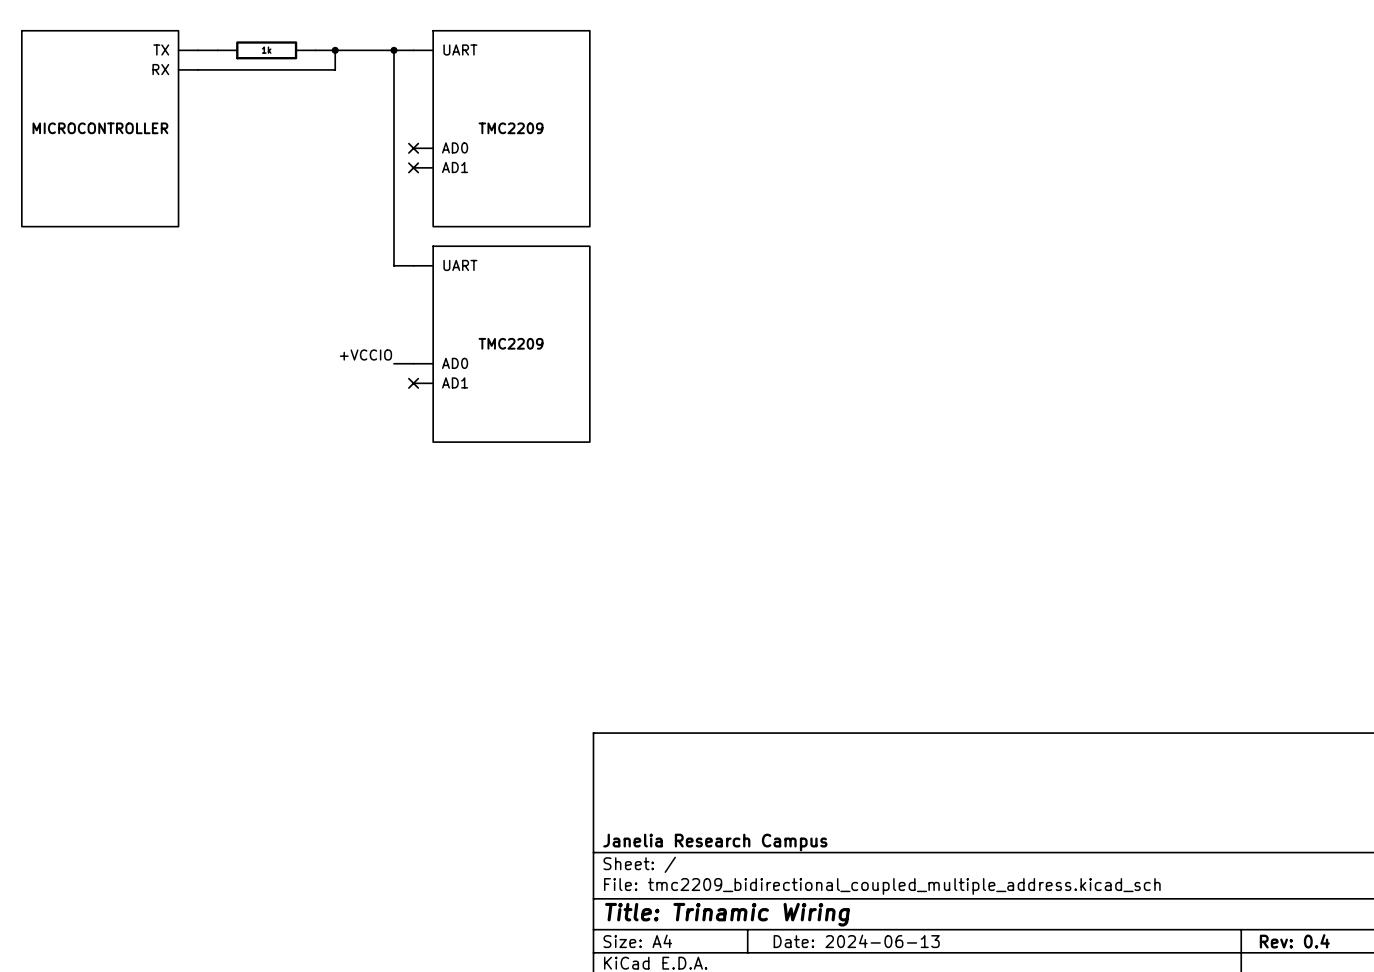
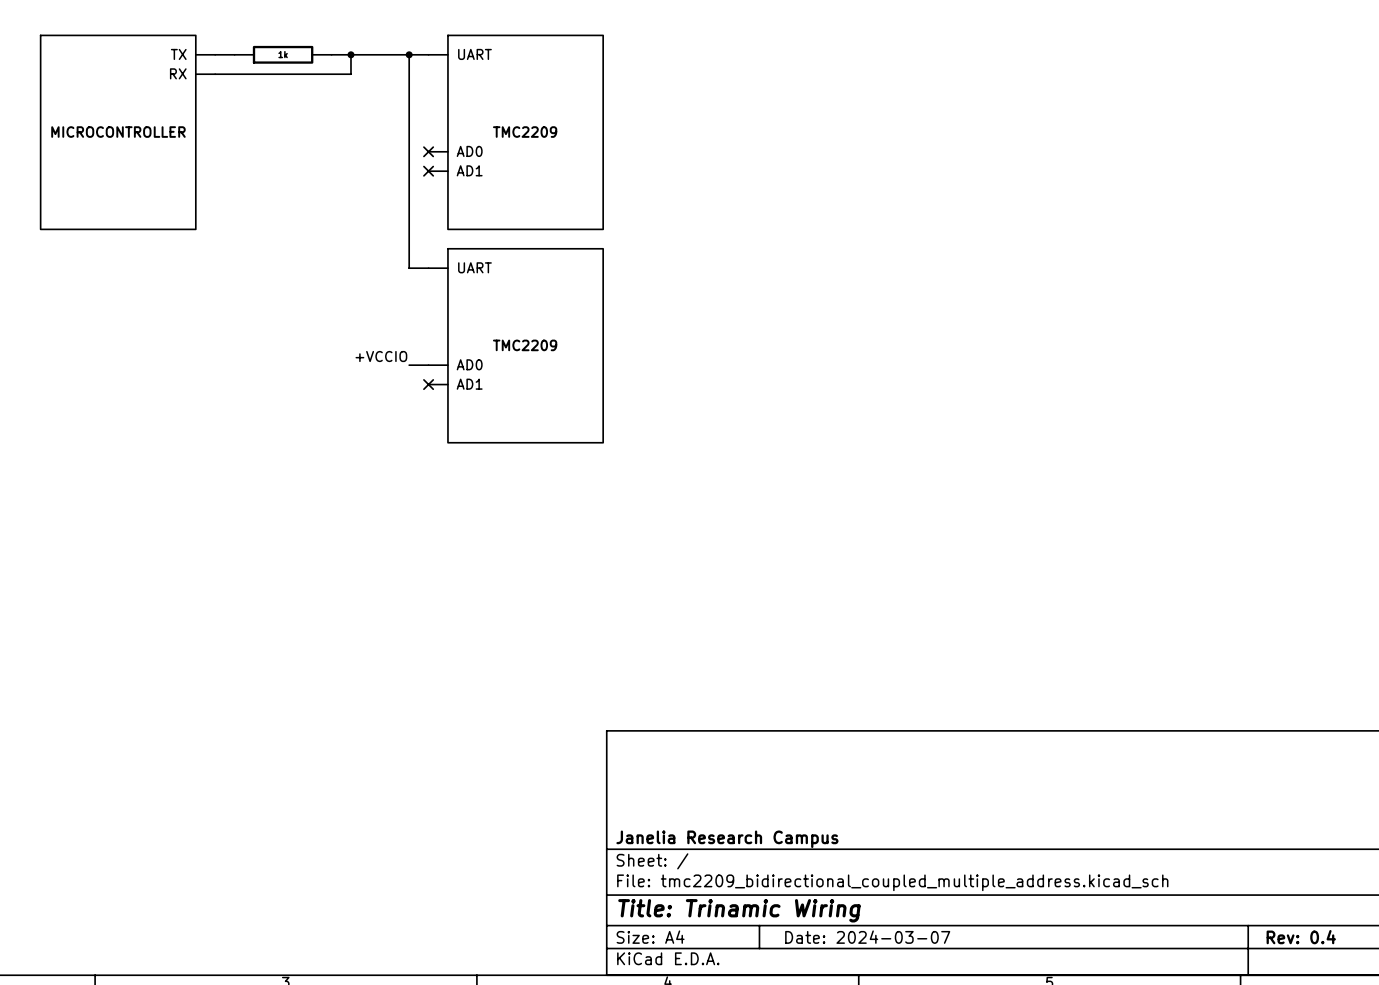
title block: Date: 2024-06-13 (856, 941) -> Date: 2024-03-07 (867, 937)

